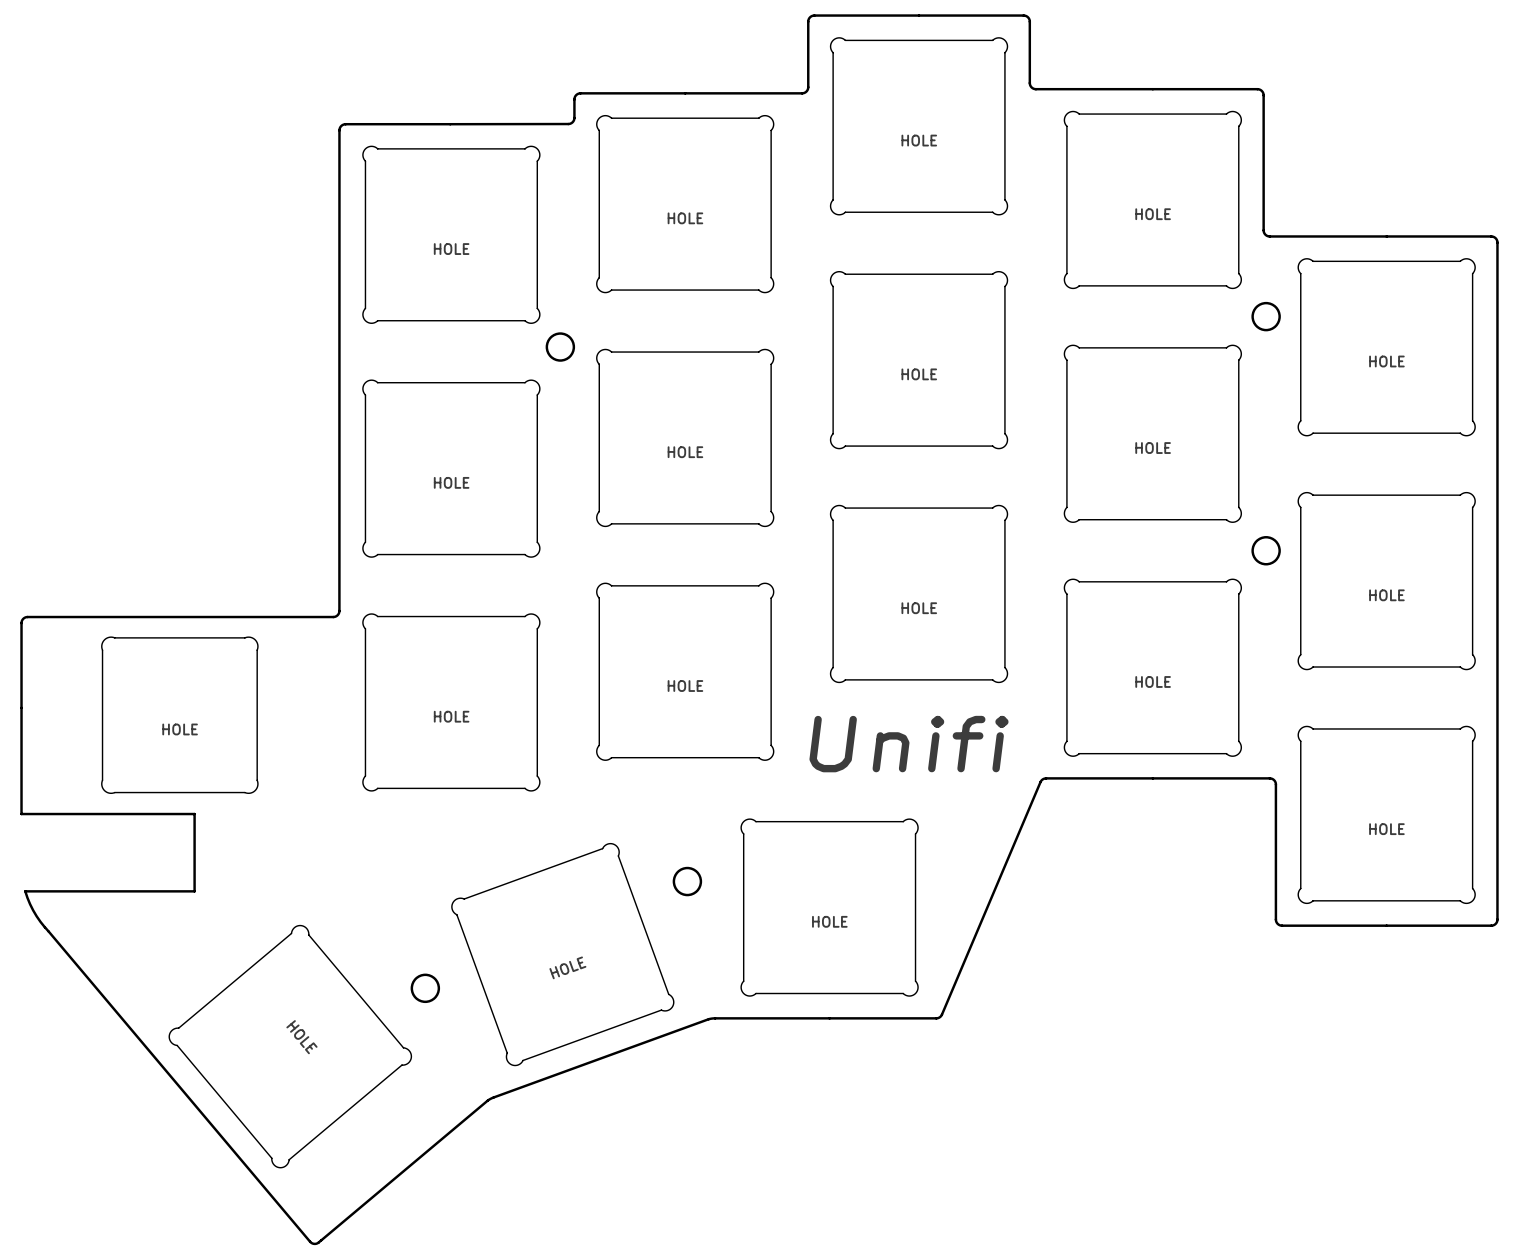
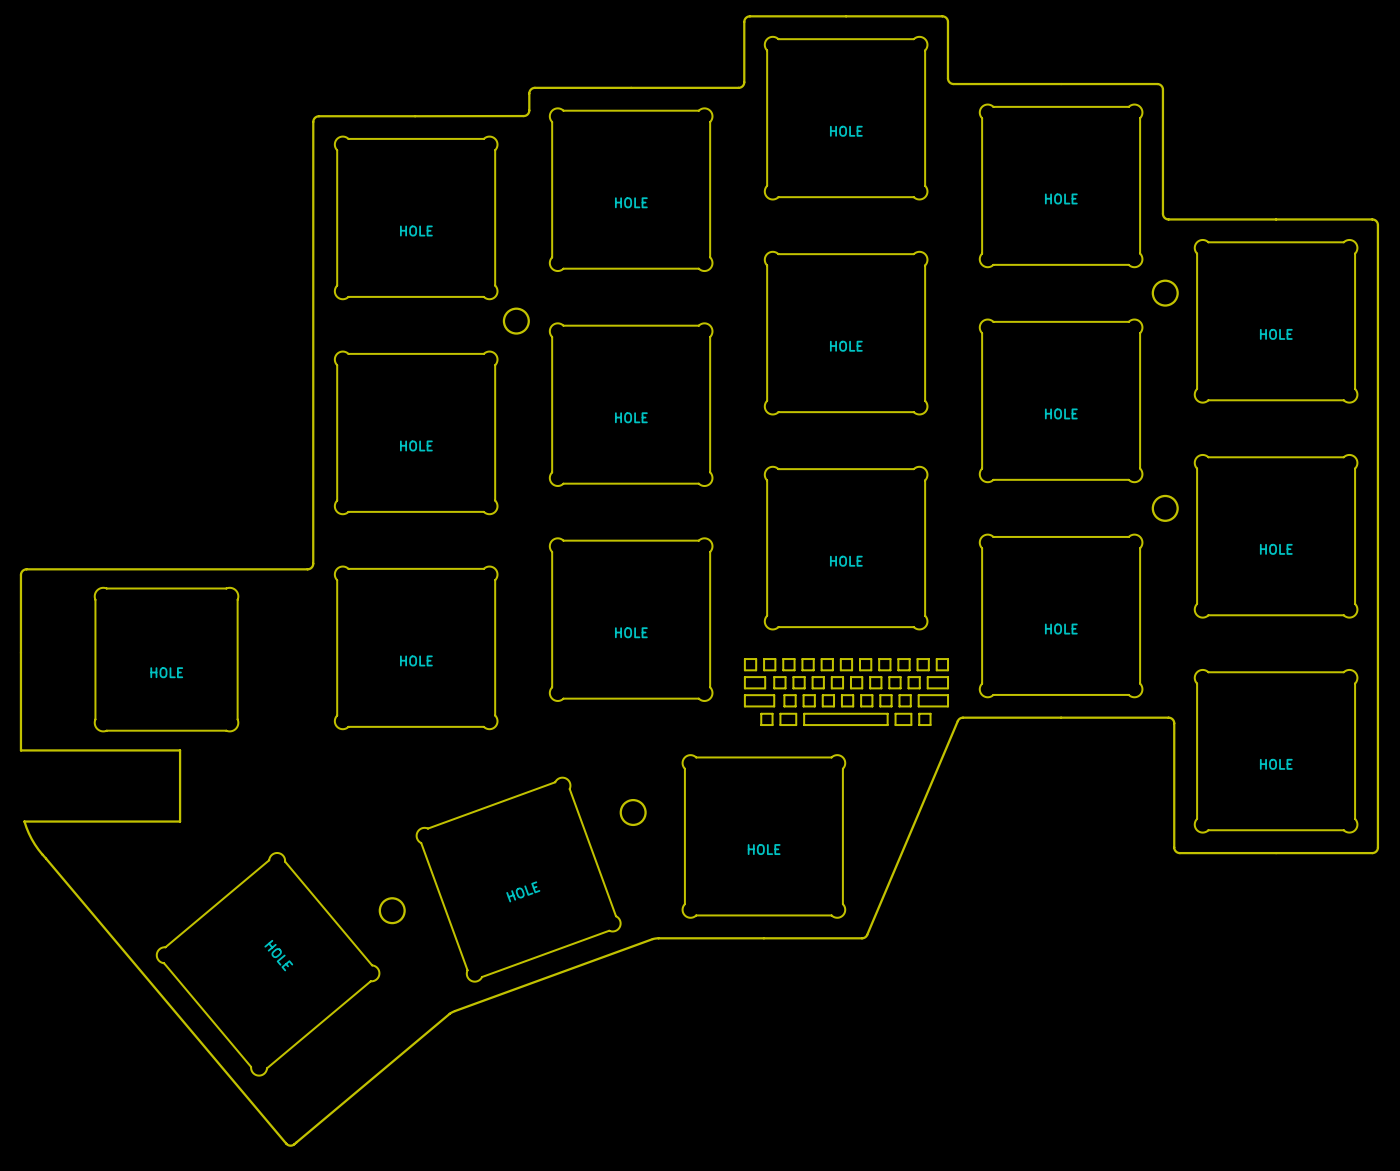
board edge: none -> (756, 659) (744, 659) (744, 670) (756, 670) (756, 659)
board edge: none -> (775, 659) (764, 659) (764, 670) (775, 670) (775, 659)
board edge: none -> (794, 659) (783, 659) (783, 670) (794, 670) (794, 659)
board edge: none -> (813, 659) (802, 659) (802, 670) (813, 670) (813, 659)
board edge: none -> (832, 659) (821, 659) (821, 670) (832, 670) (832, 659)
board edge: none -> (852, 659) (840, 659) (840, 670) (852, 670) (852, 659)
board edge: none -> (871, 659) (859, 659) (859, 670) (871, 670) (871, 659)
board edge: none -> (890, 659) (879, 659) (879, 670) (890, 670) (890, 659)
board edge: none -> (909, 659) (898, 659) (898, 670) (909, 670) (909, 659)
board edge: none -> (928, 659) (917, 659) (917, 670) (928, 670) (928, 659)
board edge: none -> (948, 659) (936, 659) (936, 670) (948, 670) (948, 659)
board edge: none -> (765, 677) (744, 677) (744, 688) (765, 688) (765, 677)
board edge: none -> (785, 677) (774, 677) (774, 688) (785, 688) (785, 677)
board edge: none -> (804, 677) (793, 677) (793, 688) (804, 688) (804, 677)
board edge: none -> (823, 677) (812, 677) (812, 688) (823, 688) (823, 677)
board edge: none -> (843, 677) (831, 677) (831, 688) (843, 688) (843, 677)
board edge: none -> (862, 677) (850, 677) (850, 688) (862, 688) (862, 677)
board edge: none -> (881, 677) (870, 677) (870, 688) (881, 688) (881, 677)
board edge: none -> (900, 677) (889, 677) (889, 688) (900, 688) (900, 677)
board edge: none -> (919, 677) (908, 677) (908, 688) (919, 688) (919, 677)
board edge: none -> (948, 677) (927, 677) (927, 688) (948, 688) (948, 677)
text: Unifi (909, 744) -> none
board edge: none -> (774, 695) (744, 695) (744, 706) (774, 706) (774, 695)
board edge: none -> (795, 695) (784, 695) (784, 706) (795, 706) (795, 695)
board edge: none -> (814, 695) (803, 695) (803, 706) (814, 706) (814, 695)
board edge: none -> (834, 695) (822, 695) (822, 706) (834, 706) (834, 695)
board edge: none -> (853, 695) (841, 695) (841, 706) (853, 706) (853, 695)
board edge: none -> (872, 695) (861, 695) (861, 706) (872, 706) (872, 695)
board edge: none -> (891, 695) (880, 695) (880, 706) (891, 706) (891, 695)
board edge: none -> (910, 695) (899, 695) (899, 706) (910, 706) (910, 695)
board edge: none -> (948, 695) (918, 695) (918, 706) (948, 706) (948, 695)
board edge: none -> (772, 713) (761, 713) (761, 725) (772, 725) (772, 713)
board edge: none -> (796, 713) (780, 713) (780, 725) (796, 725) (796, 713)
board edge: none -> (887, 713) (804, 713) (804, 725) (887, 725) (887, 713)
board edge: none -> (911, 713) (895, 713) (895, 725) (911, 725) (911, 713)
board edge: none -> (930, 713) (919, 713) (919, 725) (930, 725) (930, 713)

